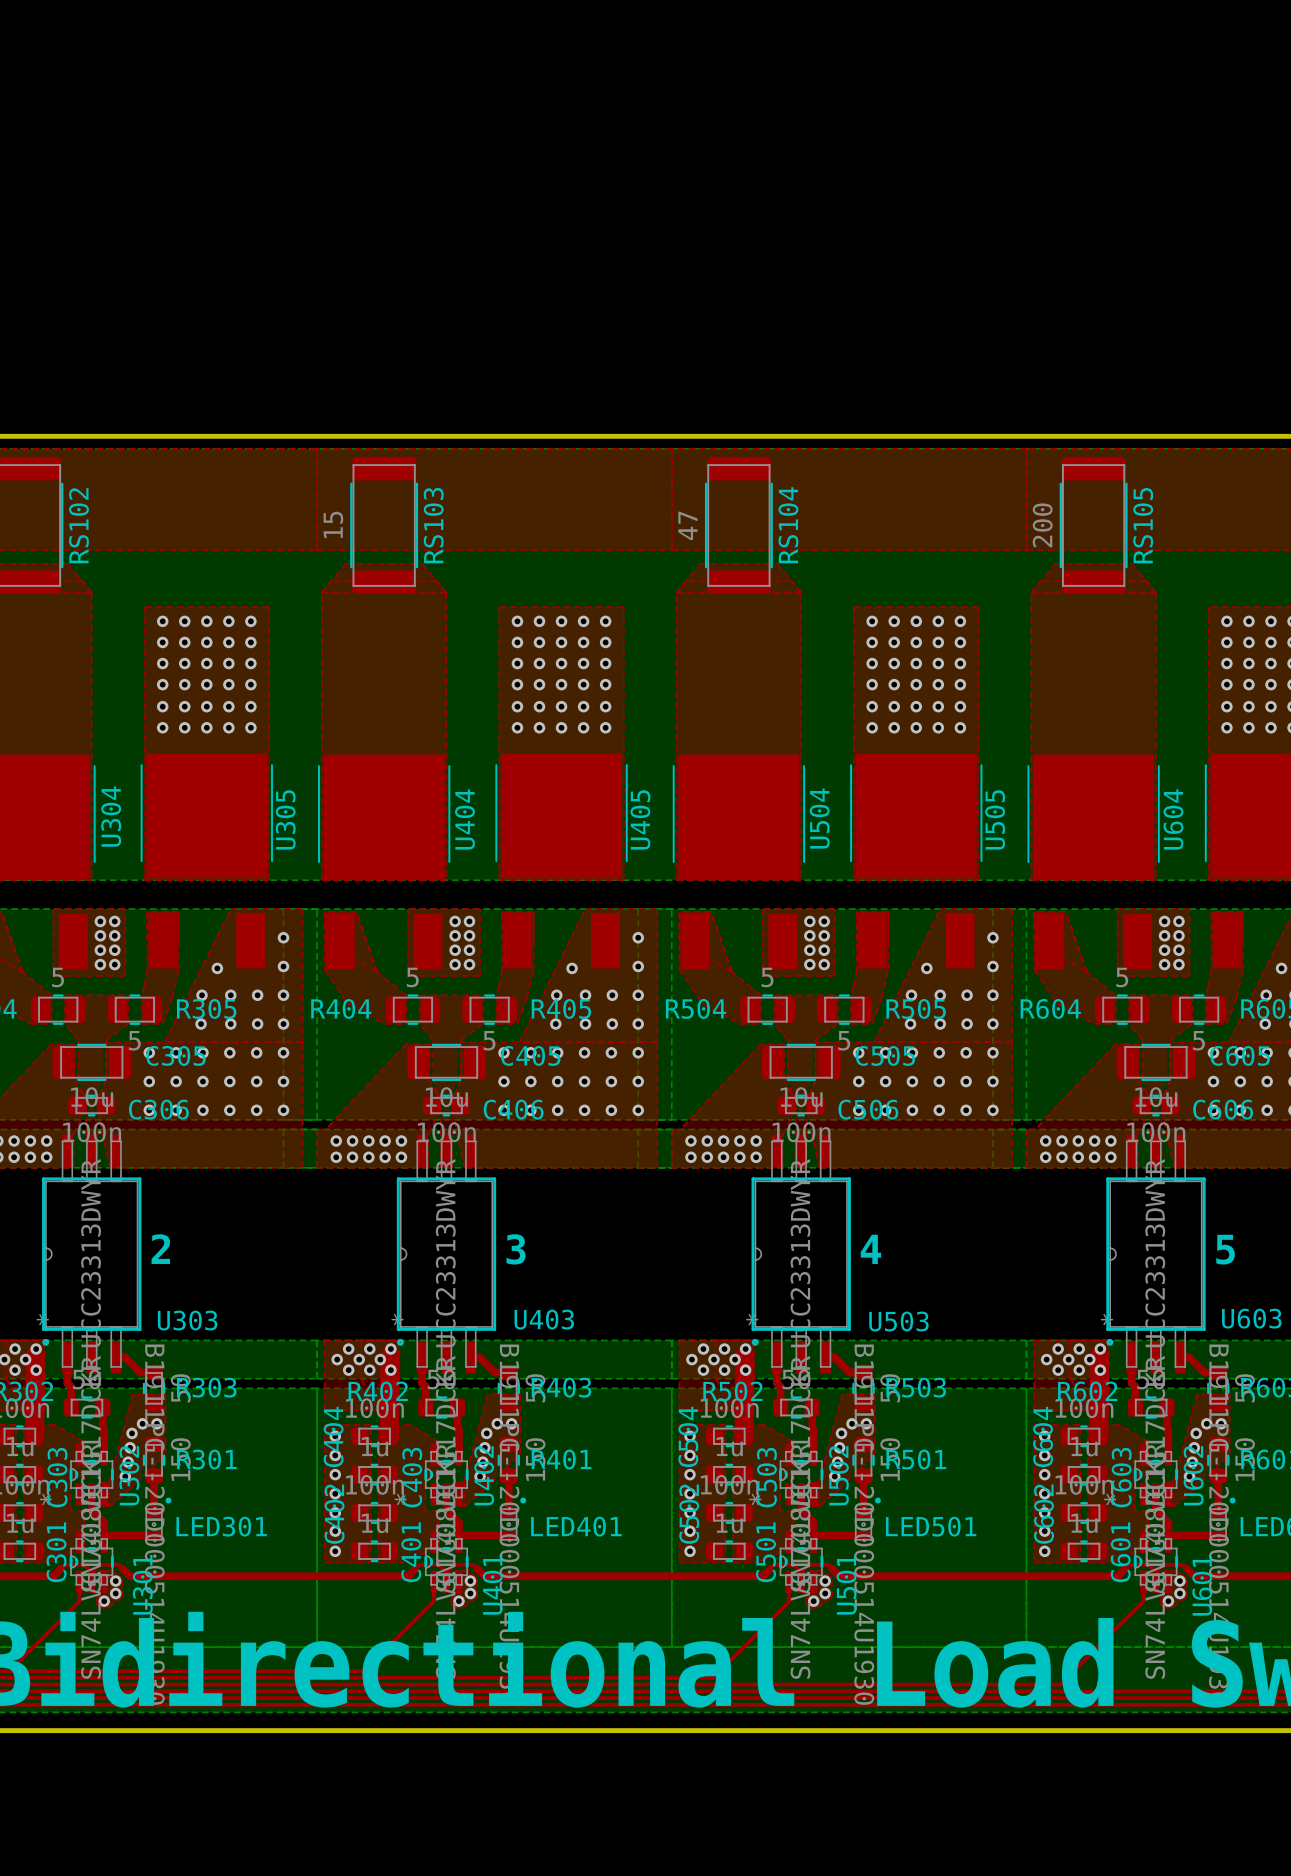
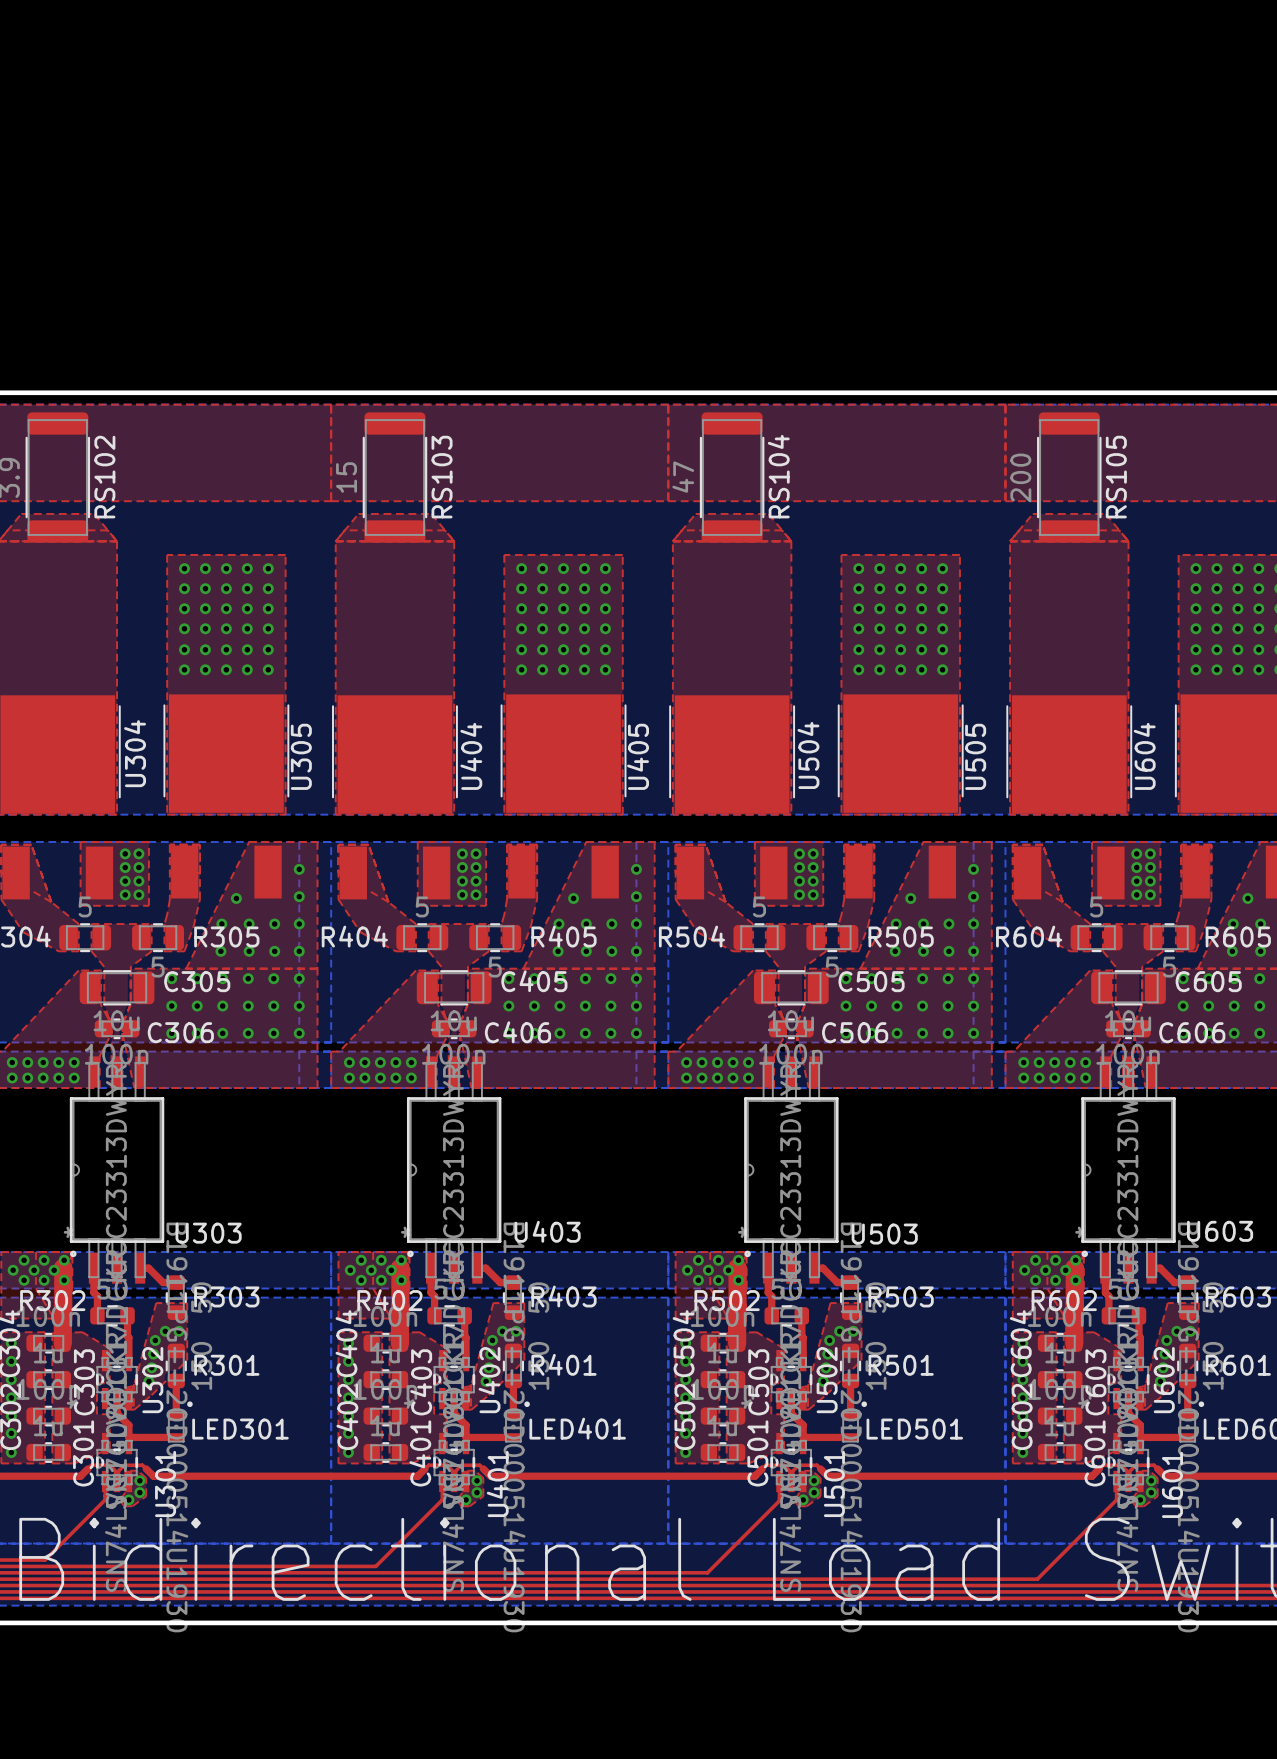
text: 2 (160, 1249) -> none
text: 3 (516, 1249) -> none
text: 4 (870, 1249) -> none
text: 5 (1225, 1249) -> none

